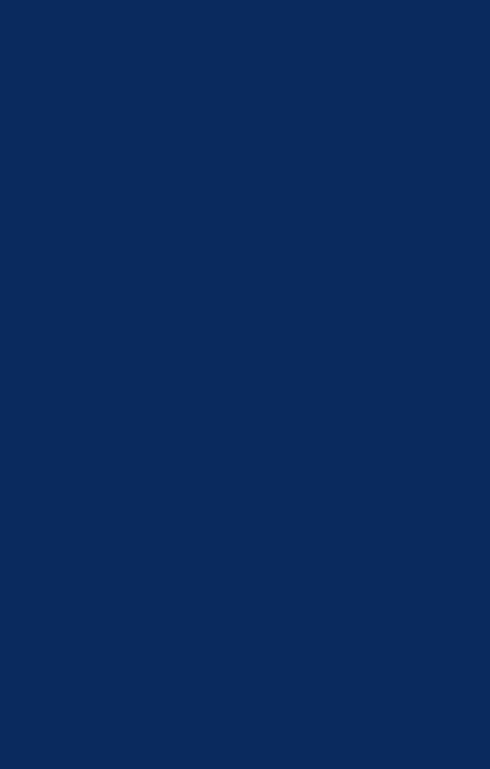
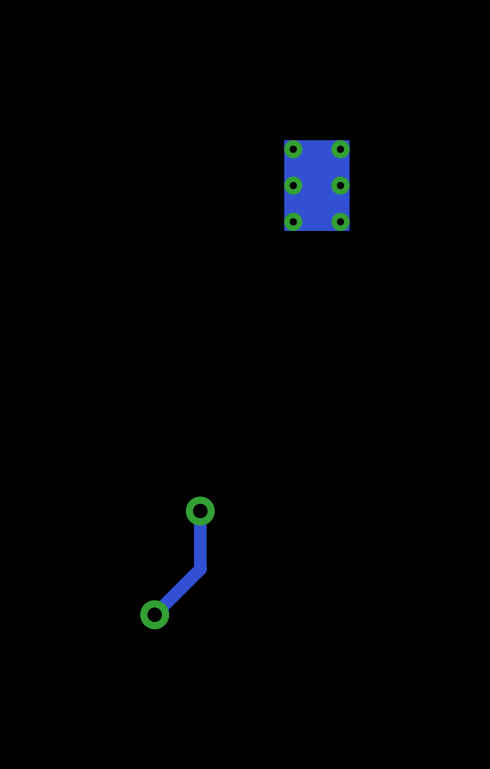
part: none -> (316, 185)
track: none -> (200, 511) (200, 569) (154, 614)
via: none -> (200, 511)
via: none -> (154, 614)

